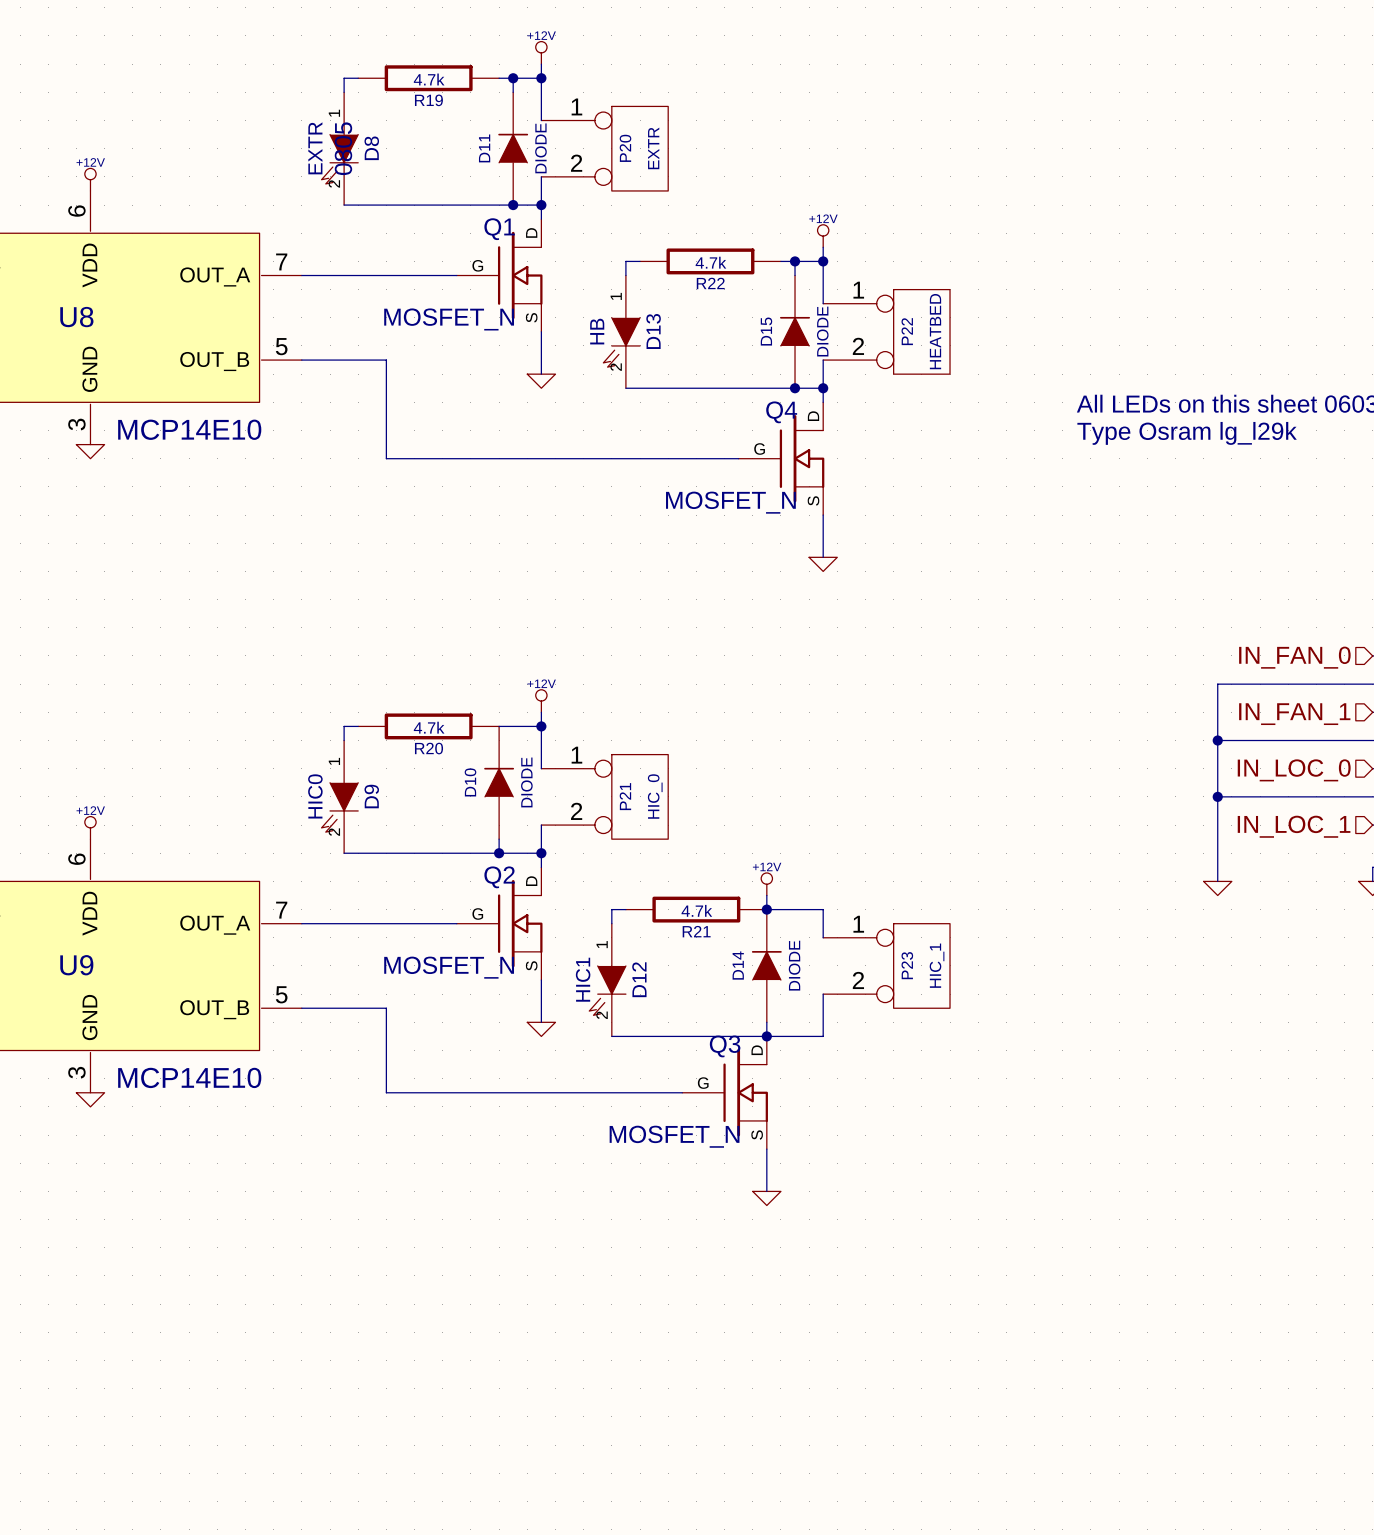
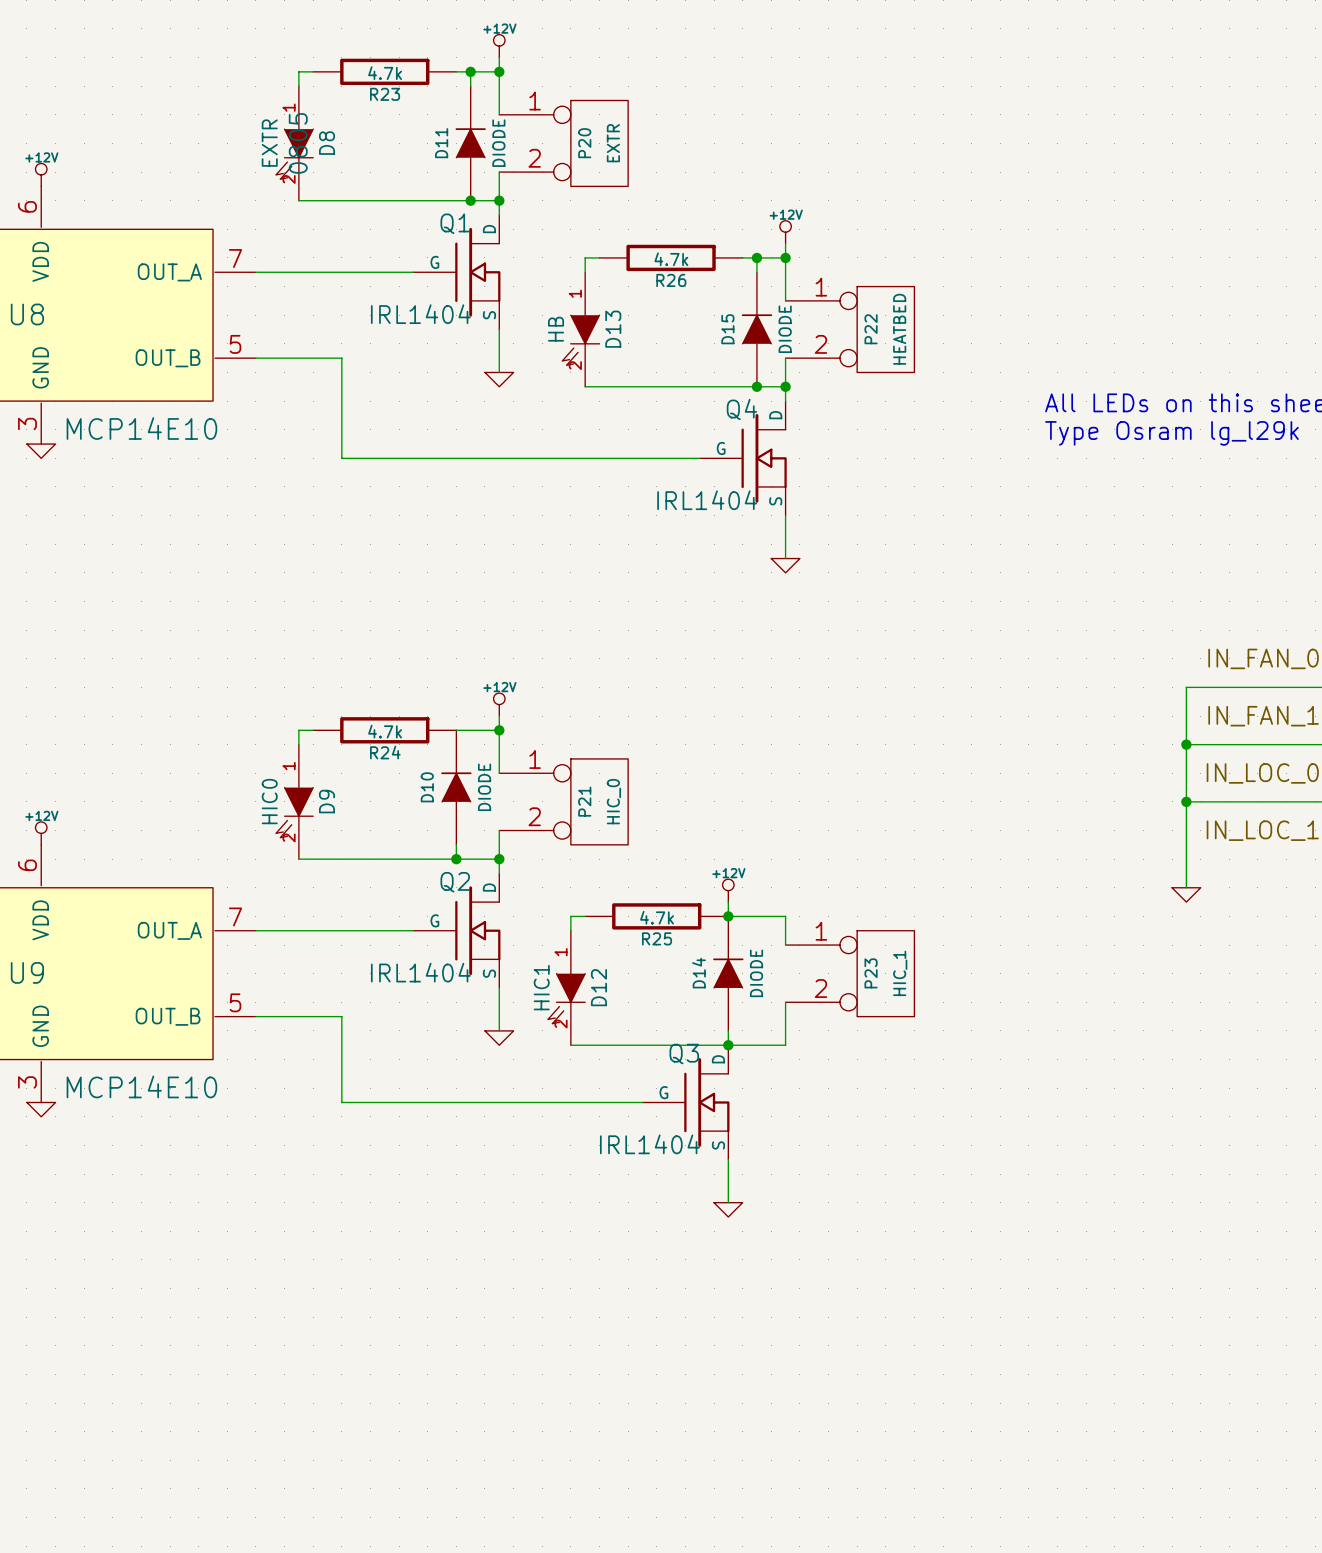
R19 name: R19 (428, 100) -> R23 (385, 94)
R22 name: R22 (710, 283) -> R26 (671, 280)
Q1 value: MOSFET_N (449, 319) -> IRL1404 (420, 314)
Q4 value: MOSFET_N (730, 502) -> IRL1404 (707, 500)
R20 name: R20 (429, 748) -> R24 (385, 752)
R21 name: R21 (696, 931) -> R25 (657, 938)
Q2 value: MOSFET_N (449, 967) -> IRL1404 (420, 972)
Q3 value: MOSFET_N (674, 1136) -> IRL1404 (649, 1144)

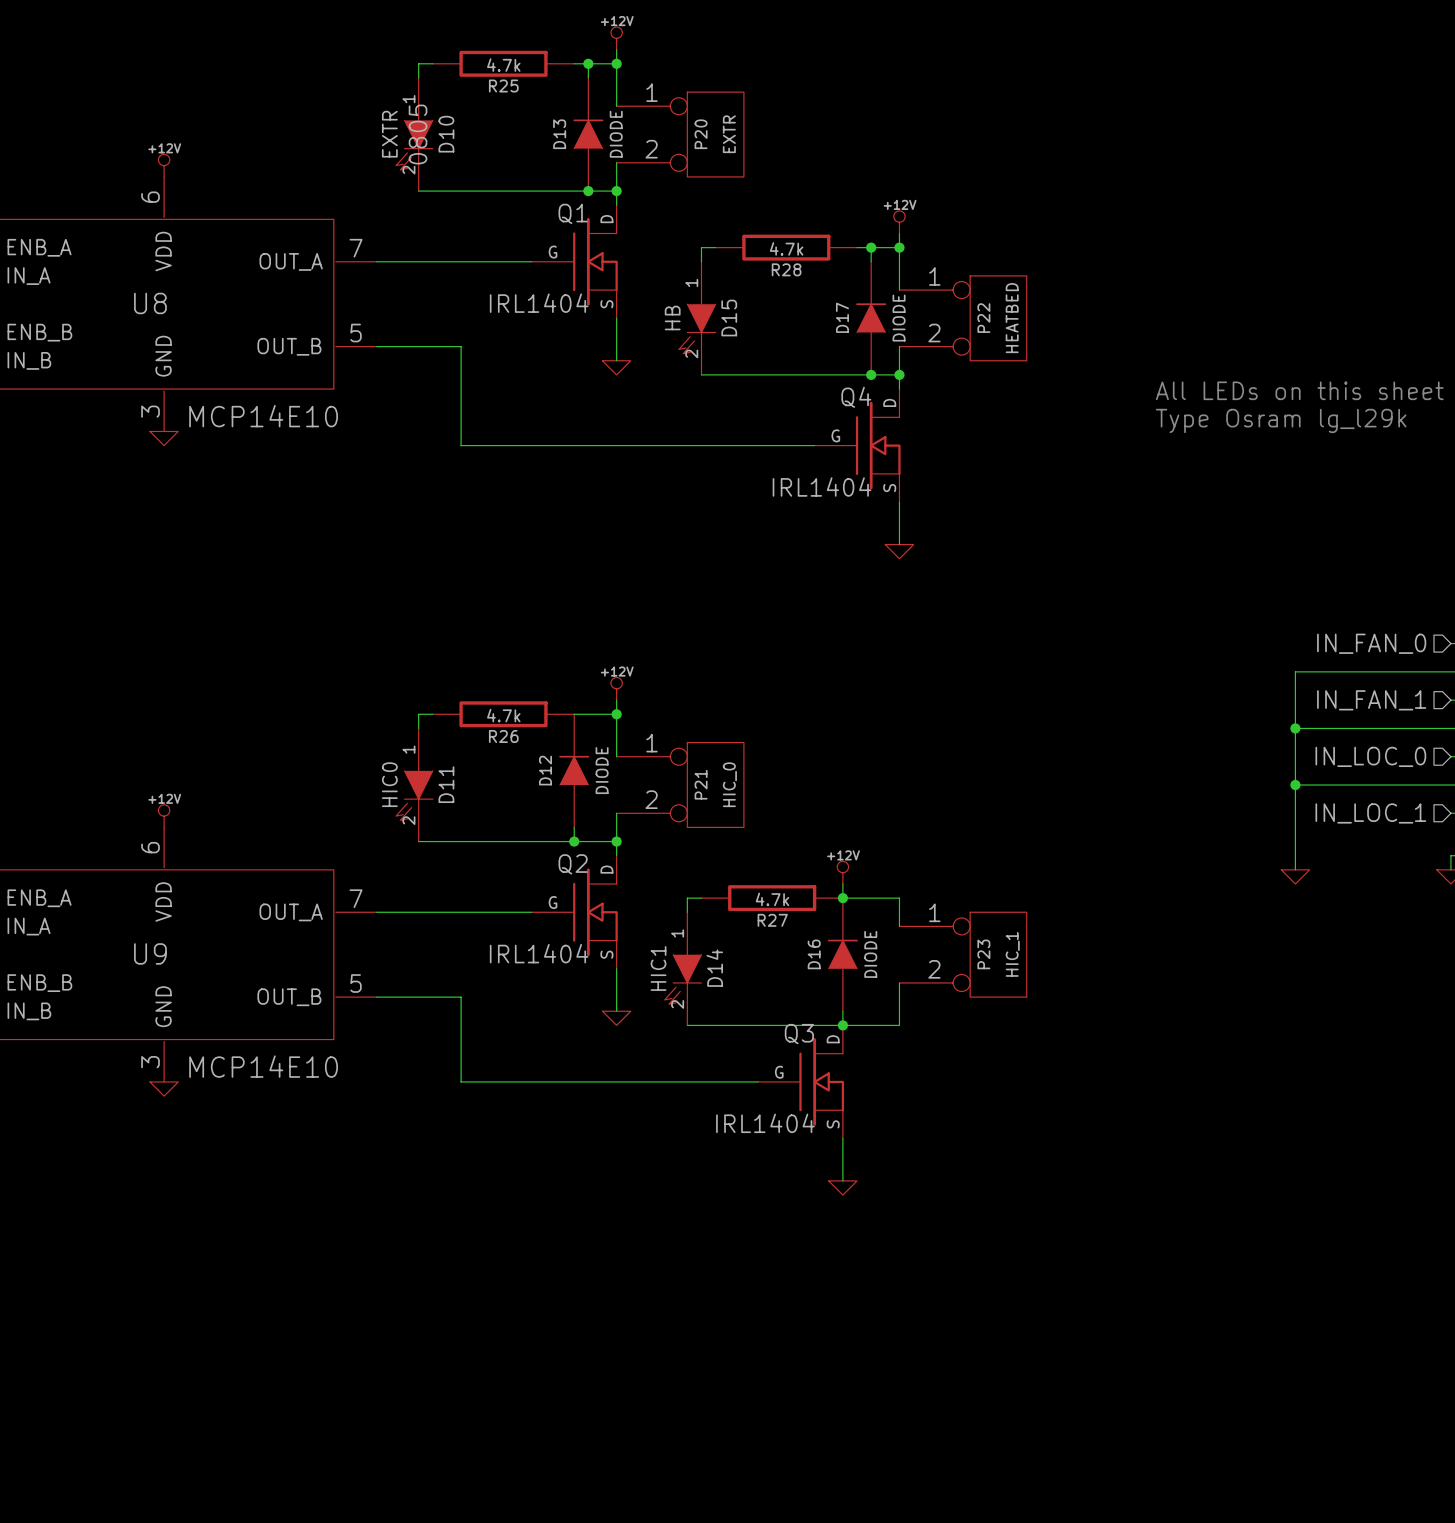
R23 name: R23 (385, 94) -> R25 (503, 86)
D8 name: D8 (326, 143) -> D10 (446, 134)
D11 name: D11 (441, 143) -> D13 (559, 134)
R26 name: R26 (671, 280) -> R28 (786, 269)
D13 name: D13 (613, 329) -> D15 (729, 318)
D15 name: D15 (727, 329) -> D17 (842, 317)
R24 name: R24 (385, 752) -> R26 (503, 736)
D10 name: D10 (427, 787) -> D12 (545, 770)
D9 name: D9 (326, 801) -> D11 (446, 784)
R25 name: R25 (657, 938) -> R27 (772, 920)
D14 name: D14 (699, 973) -> D16 (814, 954)
D12 name: D12 (598, 987) -> D14 (714, 968)

